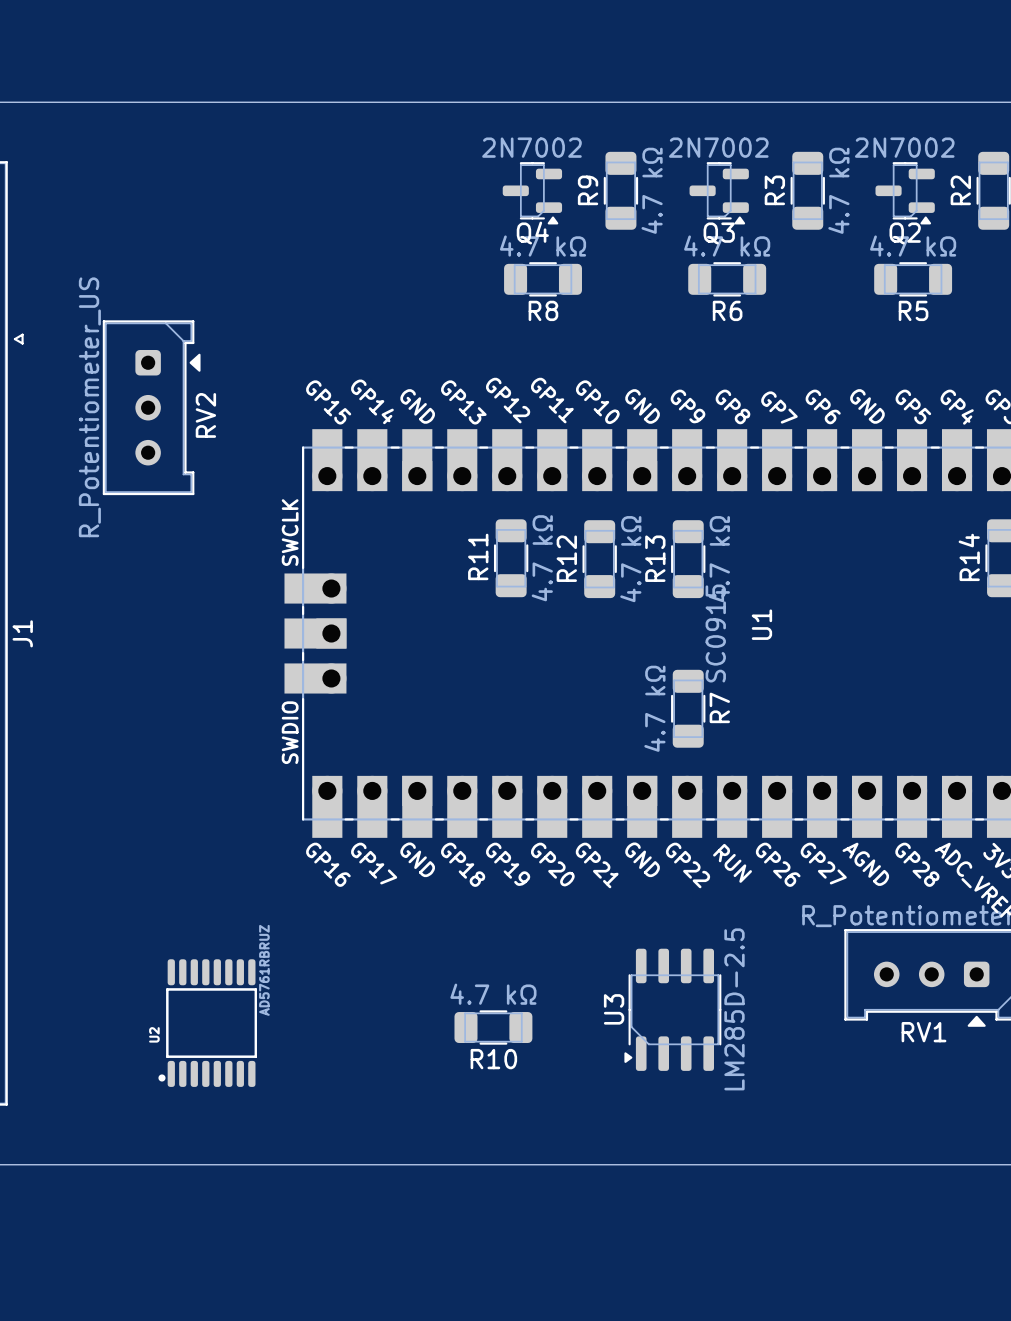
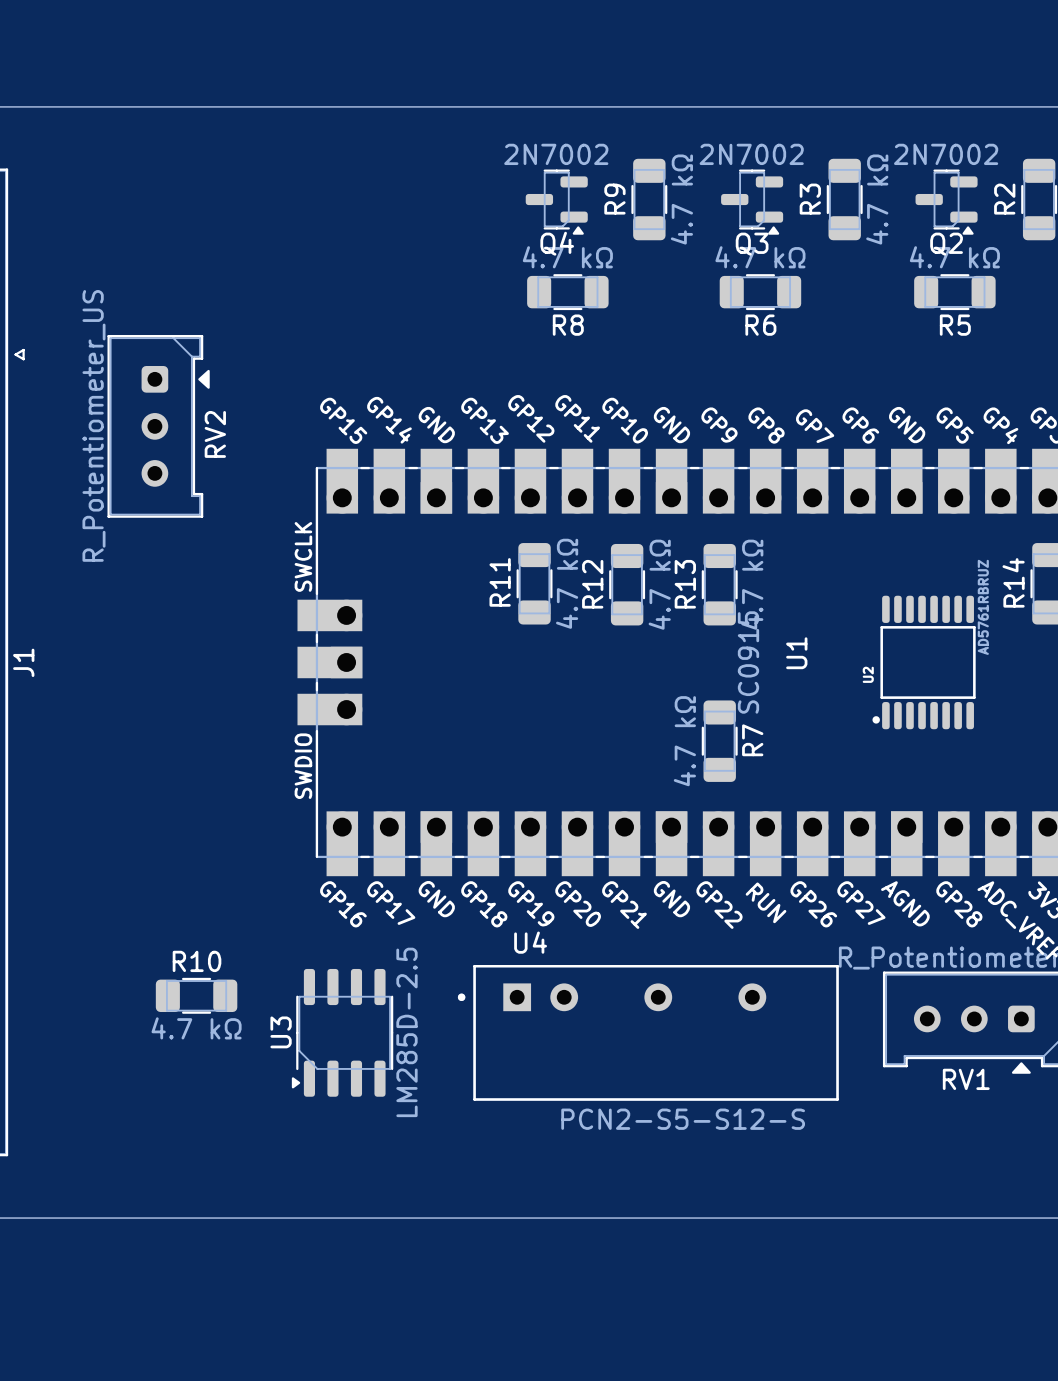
U4: none -> PCN2-S5-S12-S (648, 1032)
R10 value position: 4.7 kΩ (493, 994) -> 4.7 kΩ (196, 1028)
U3 position: (672, 1009) -> (342, 1032)
U2 position: (207, 1023) -> (924, 662)
R10 position: (493, 1027) -> (196, 995)
R10 name position: R10 (493, 1059) -> R10 (197, 961)

